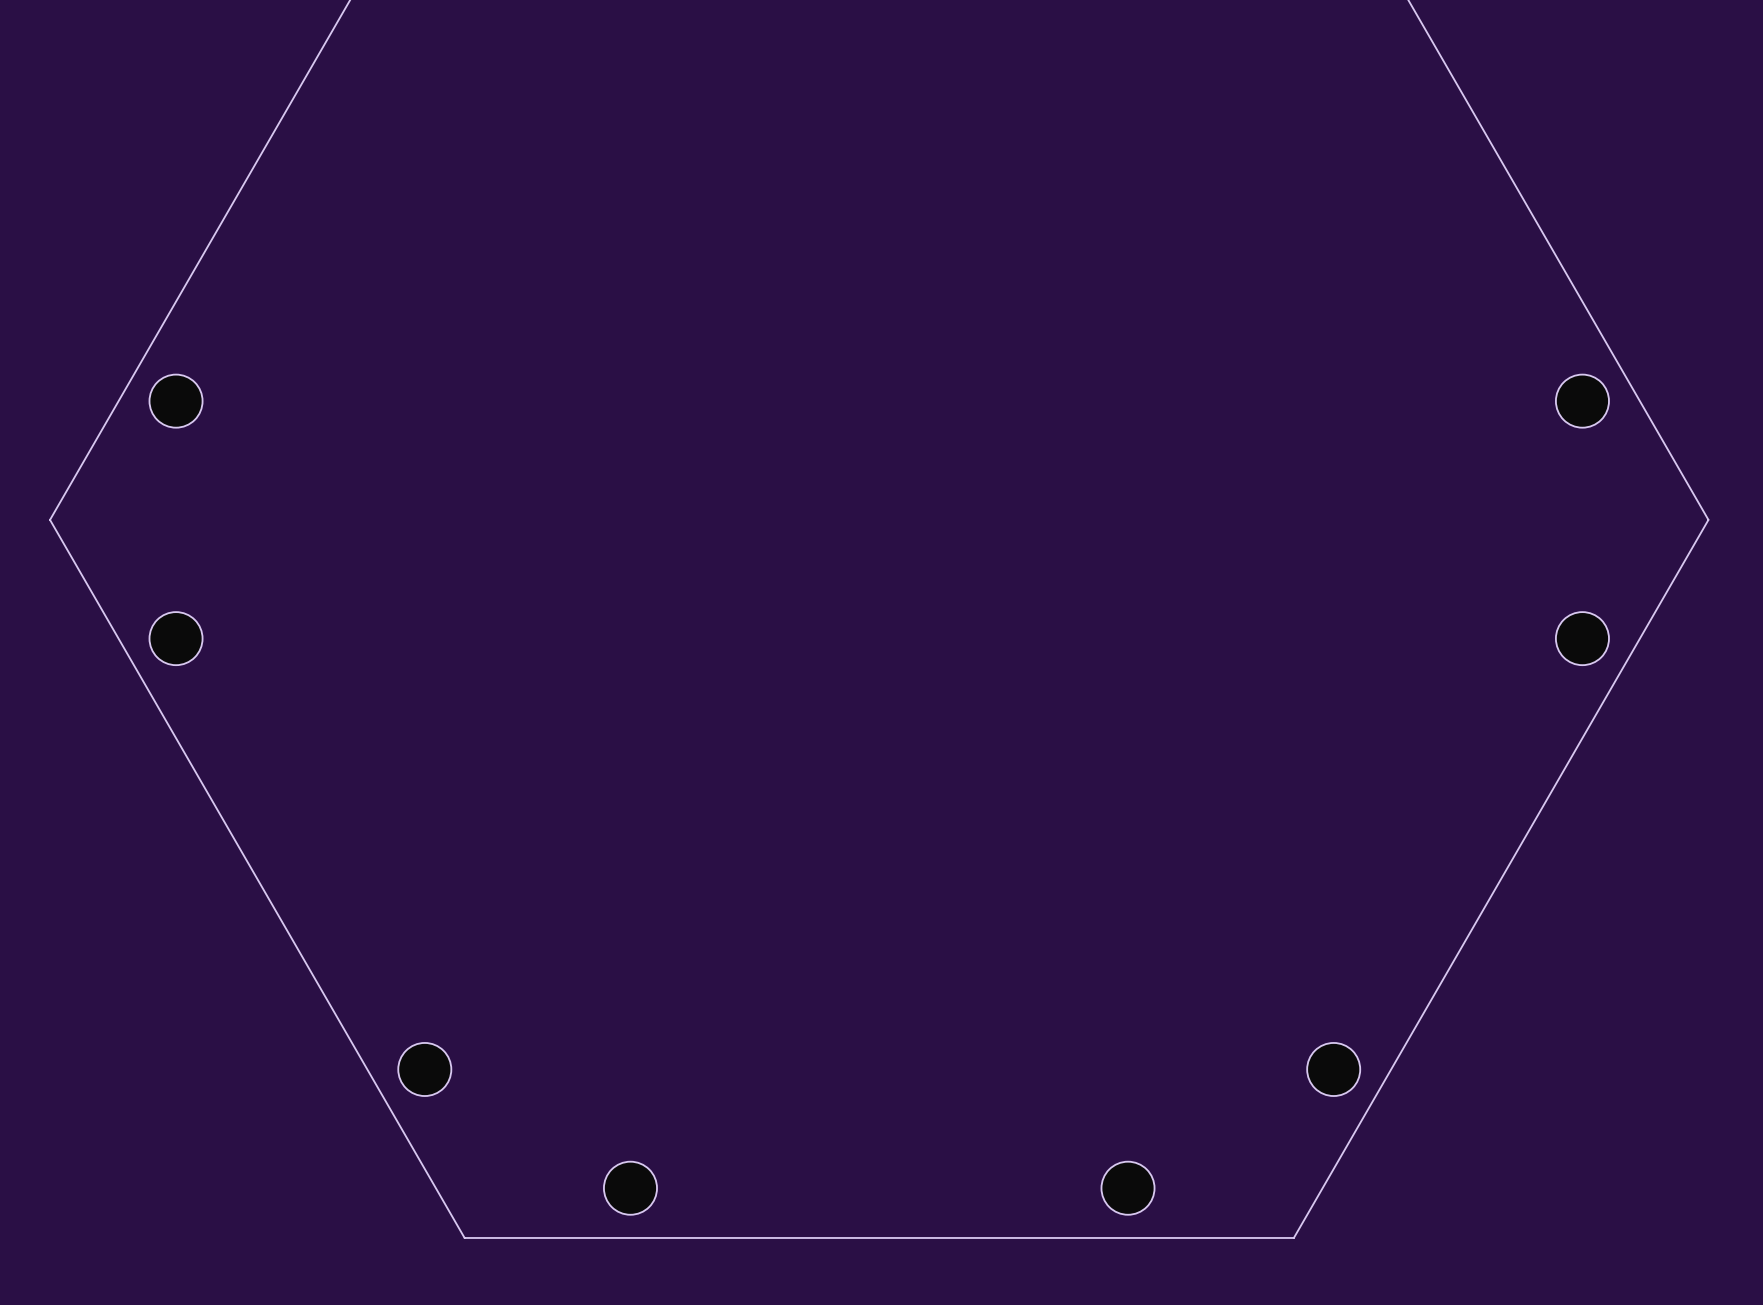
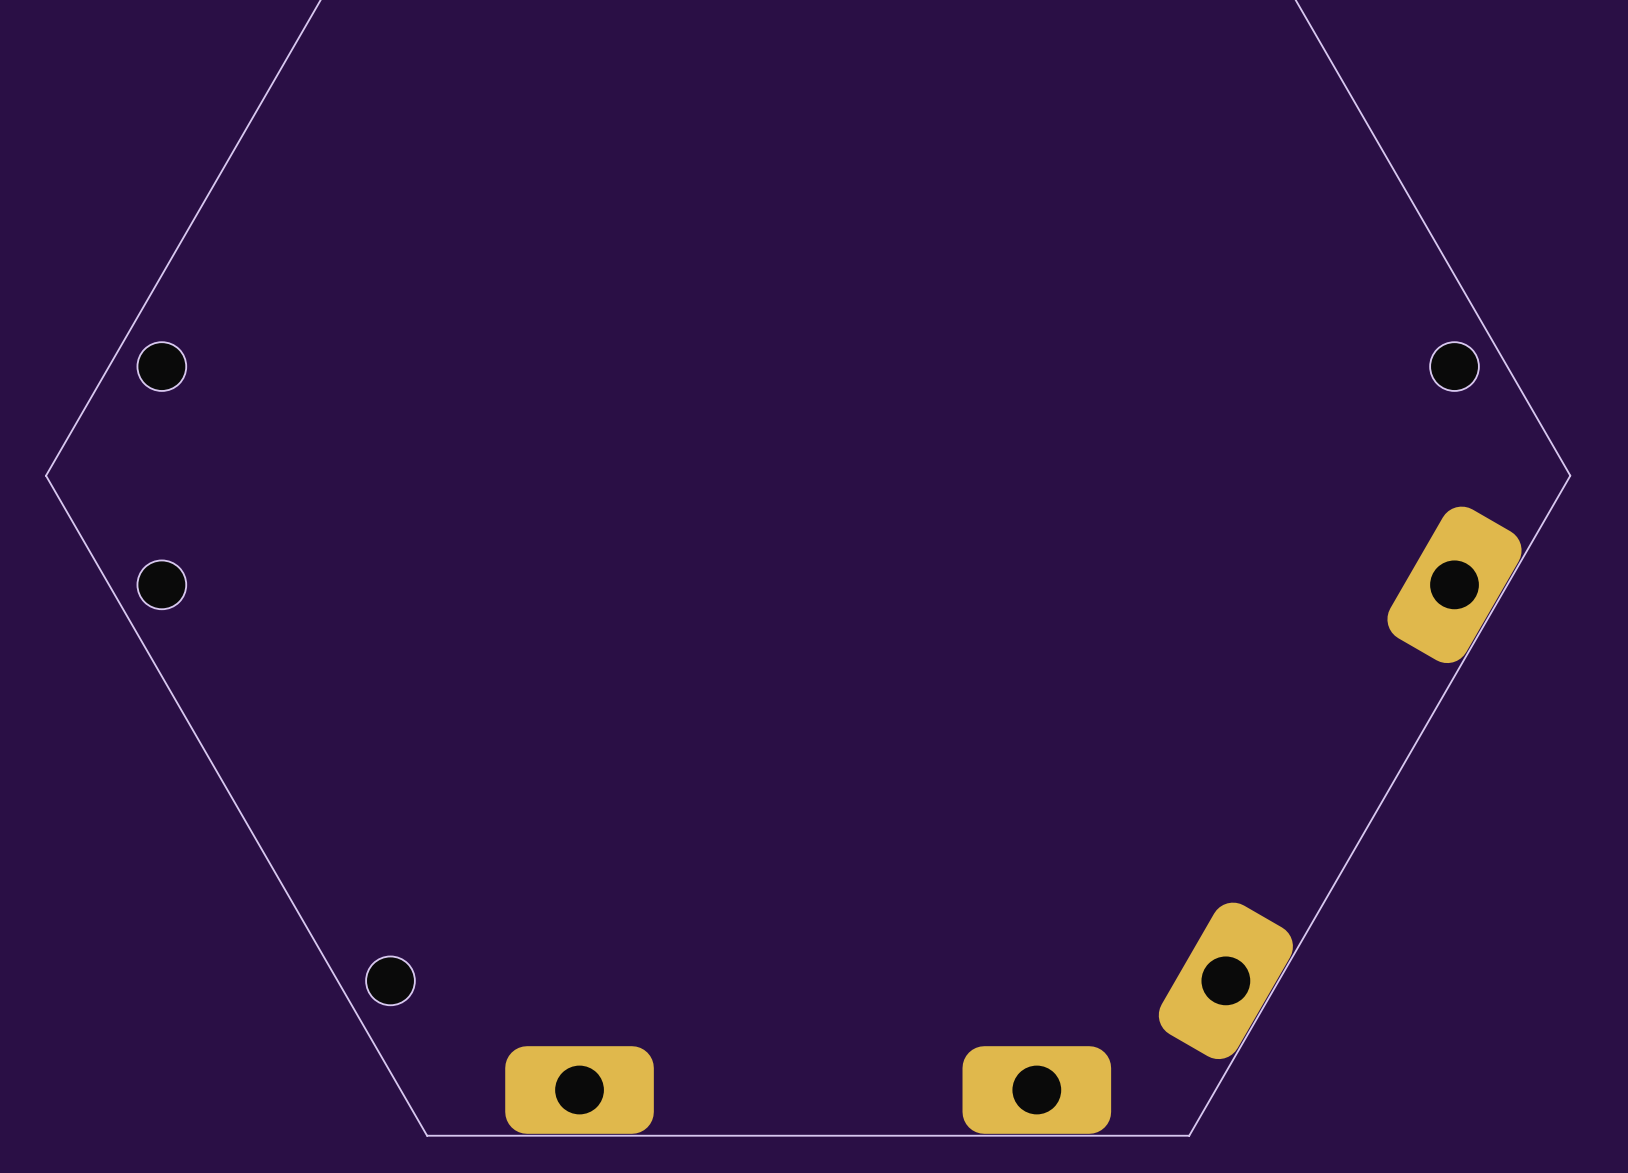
part footprint: [1555, 612, 1609, 666] -> [1387, 506, 1522, 664]
part footprint: [1307, 1042, 1361, 1097] -> [1158, 902, 1293, 1060]
part footprint: [603, 1161, 658, 1215] -> [505, 1046, 654, 1134]
part footprint: [1101, 1161, 1155, 1215] -> [962, 1046, 1112, 1134]

